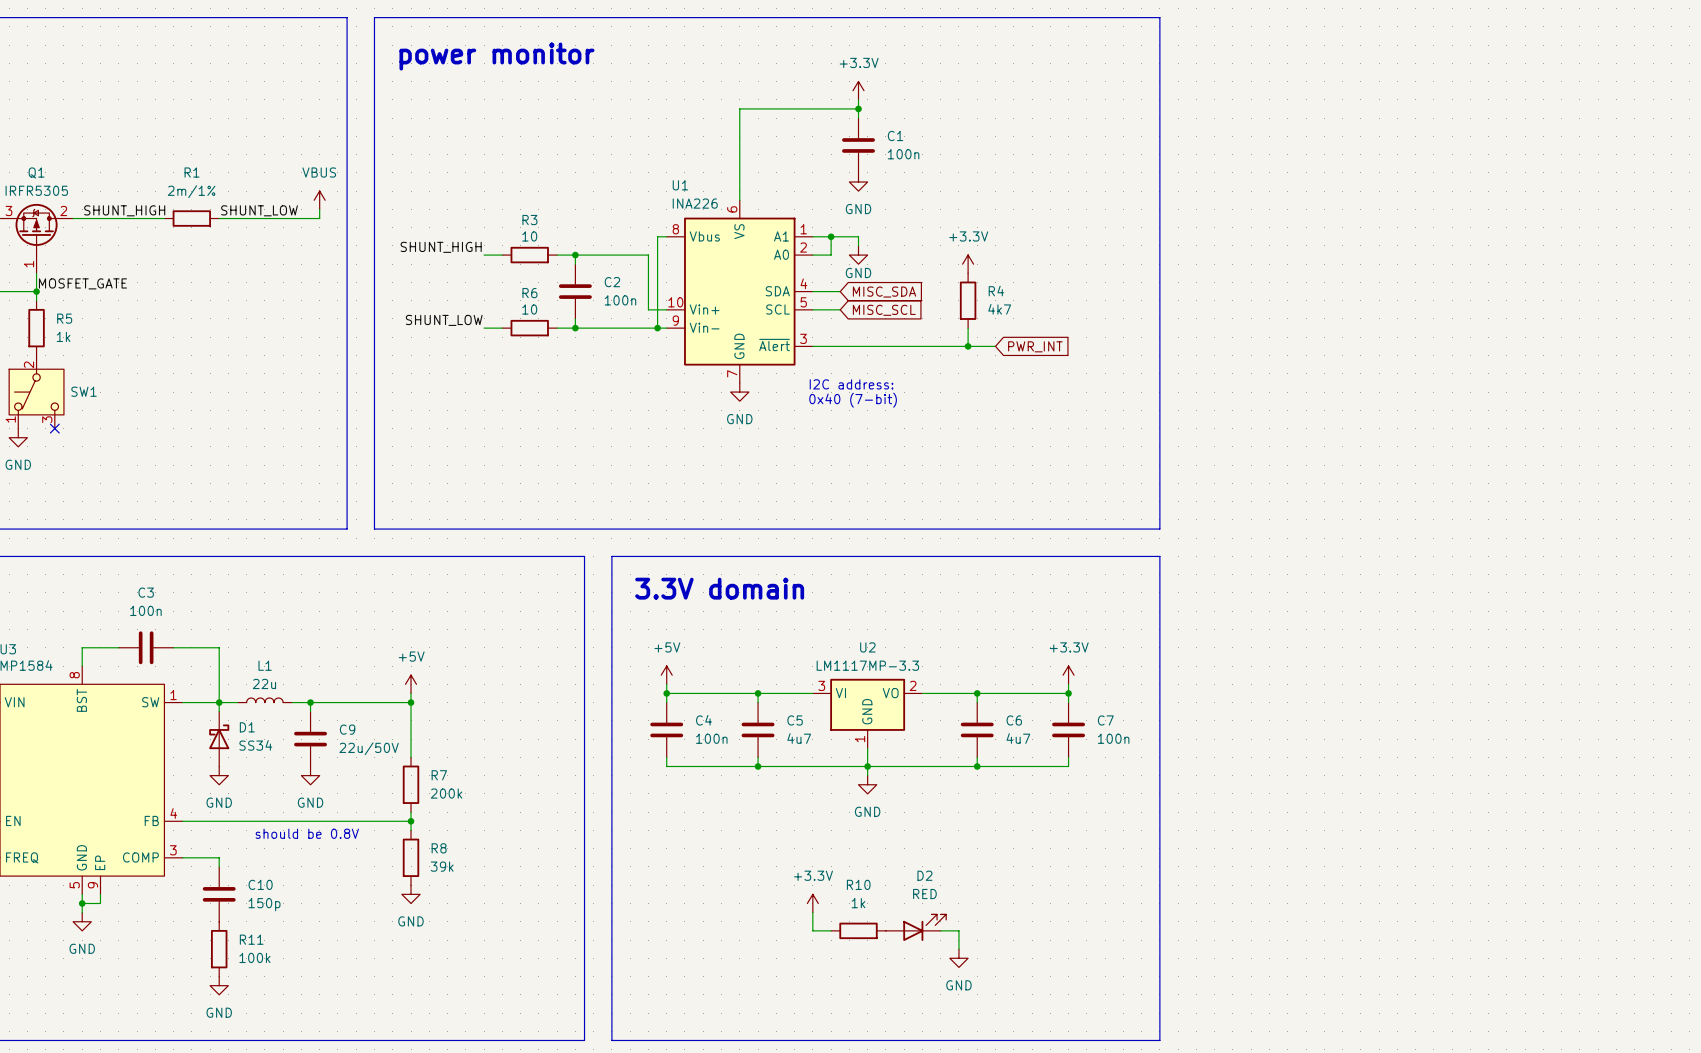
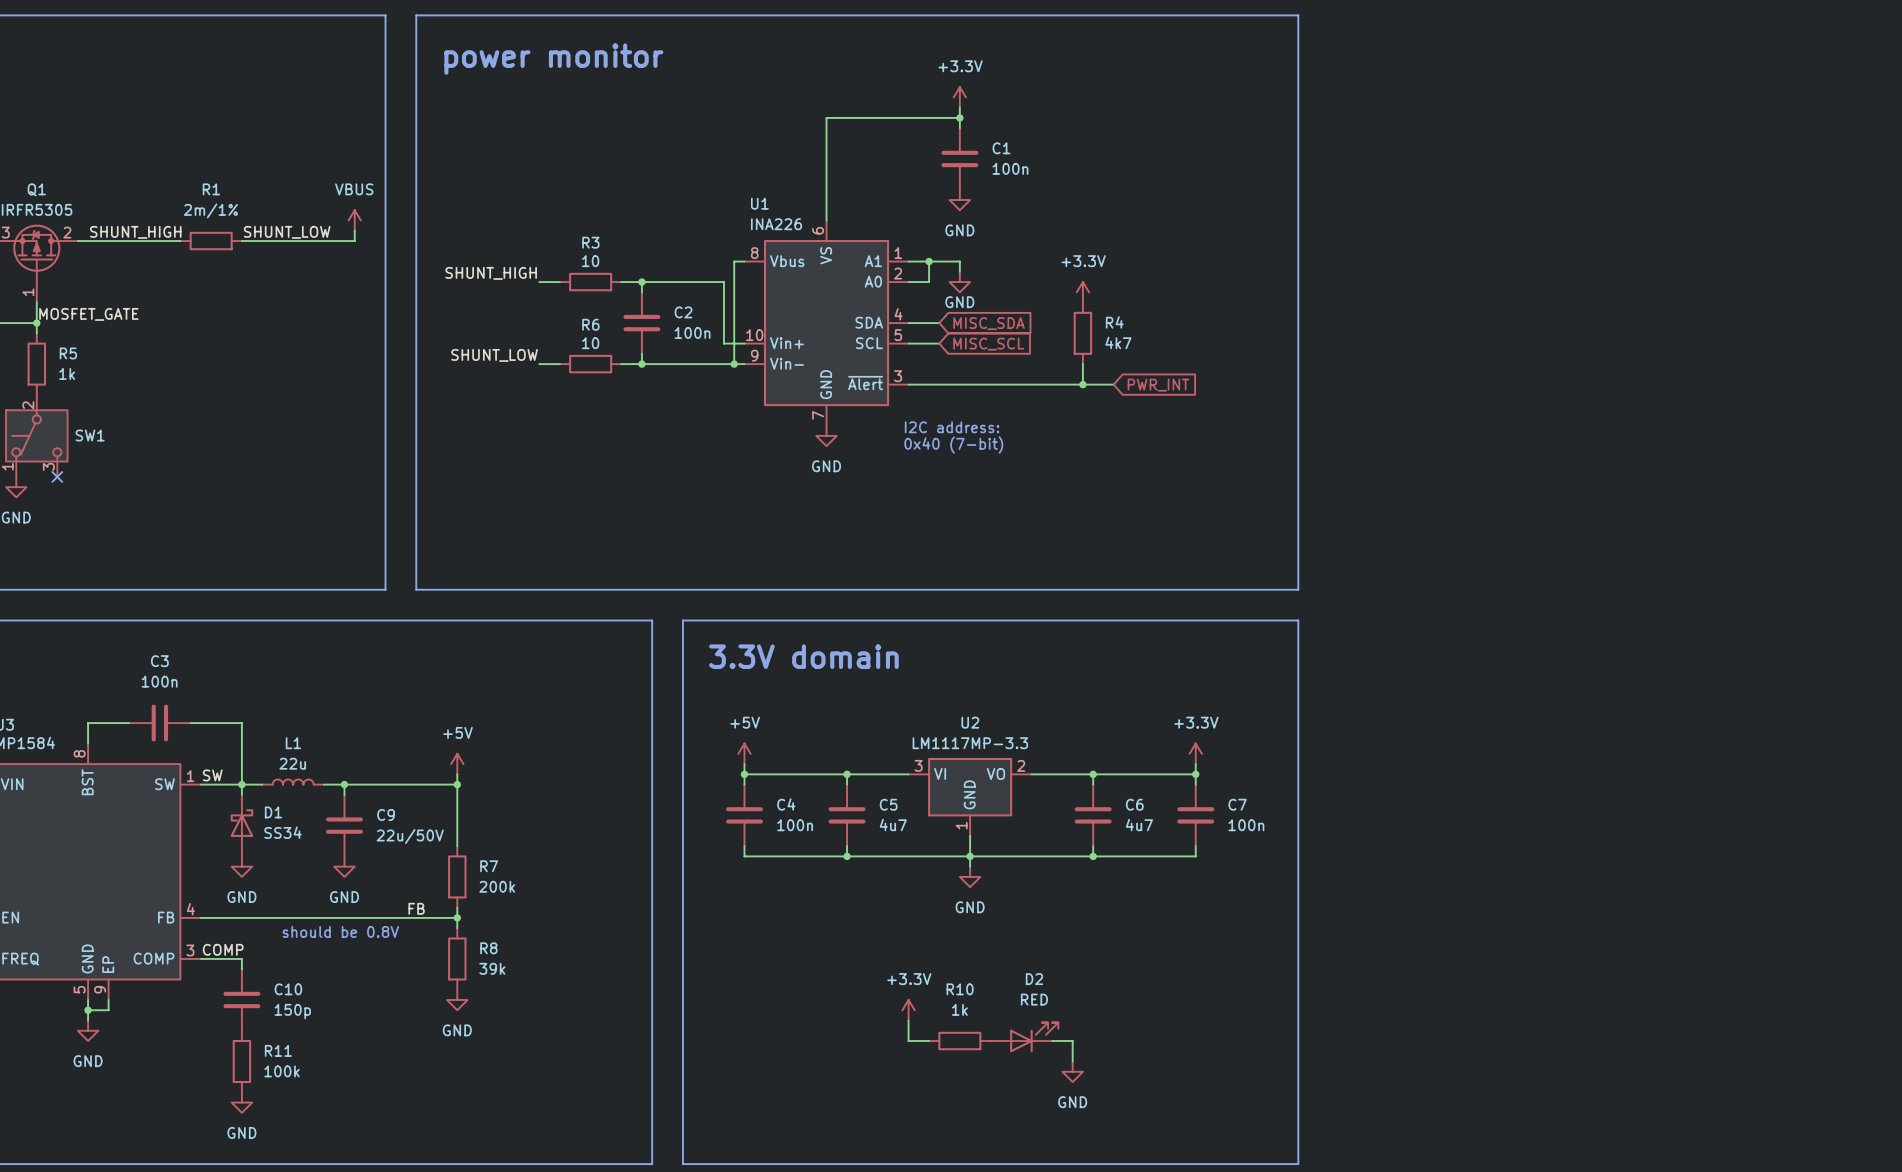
label: none -> SW (212, 775)
label: none -> FB (416, 908)
label: none -> COMP (223, 949)

